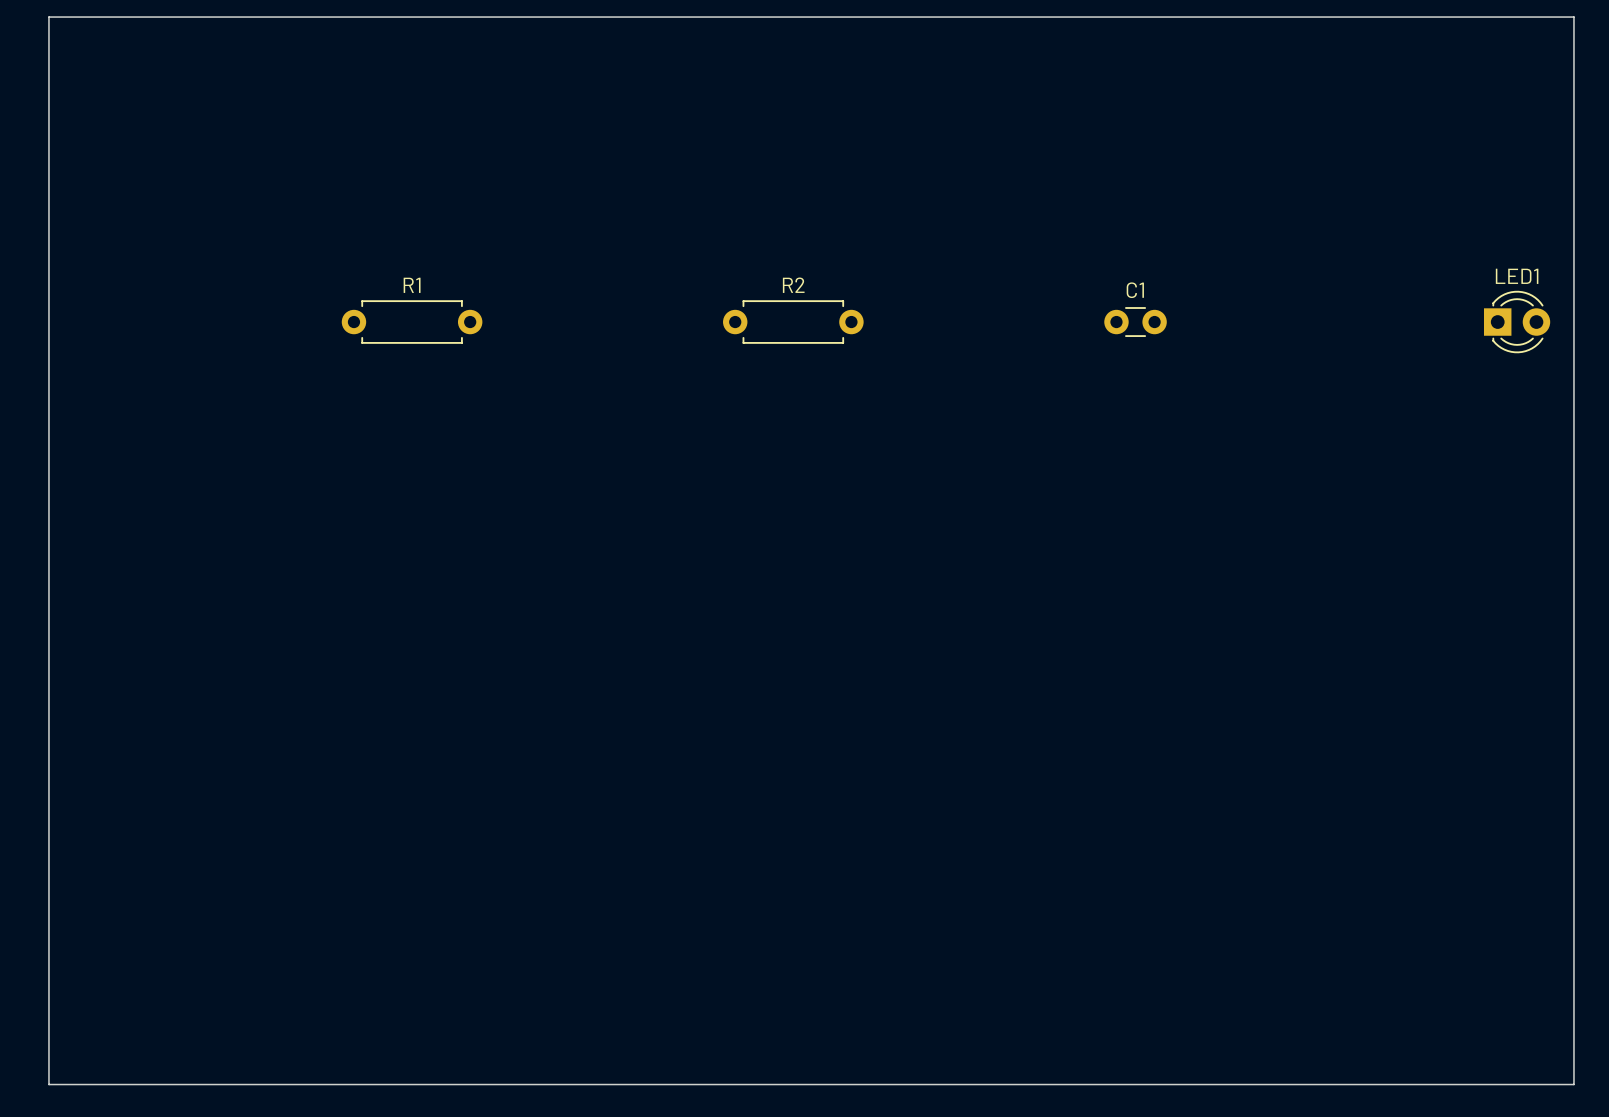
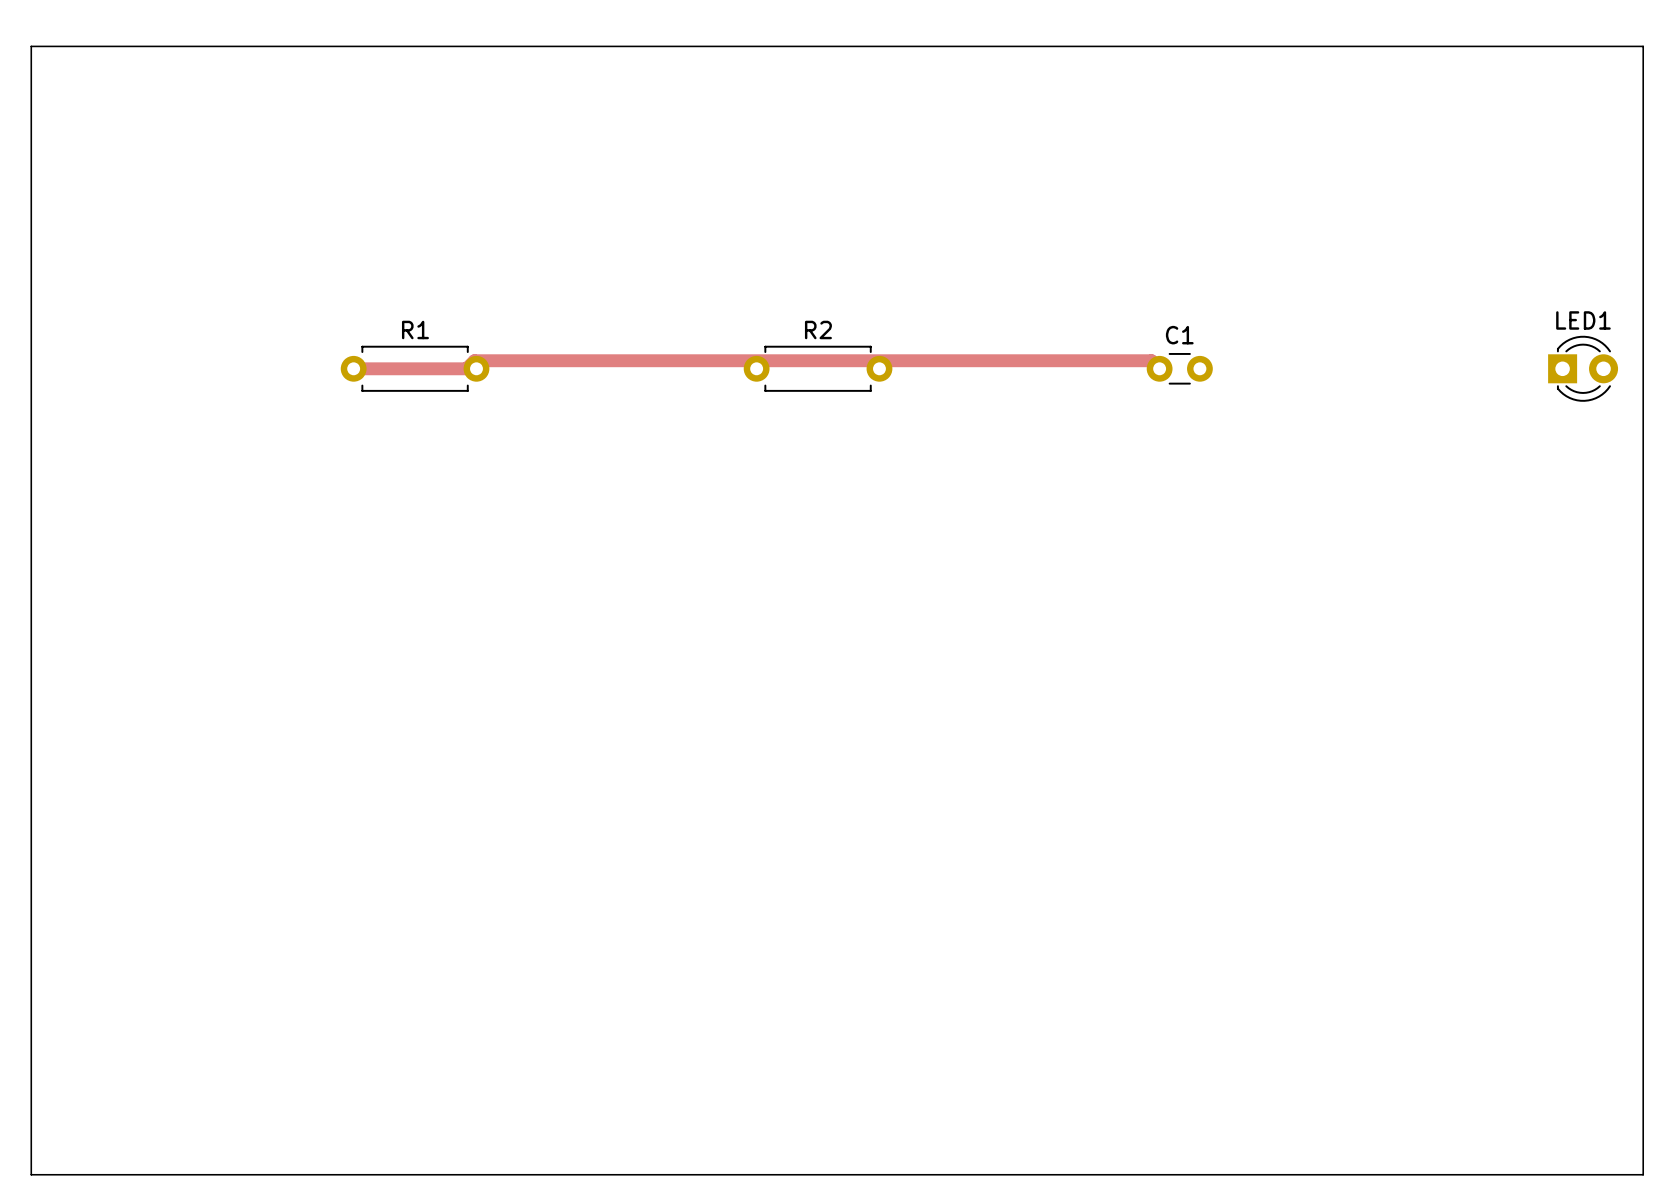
top track: none -> (353, 368) (466, 368) (474, 360) (1151, 360) (1159, 368)

